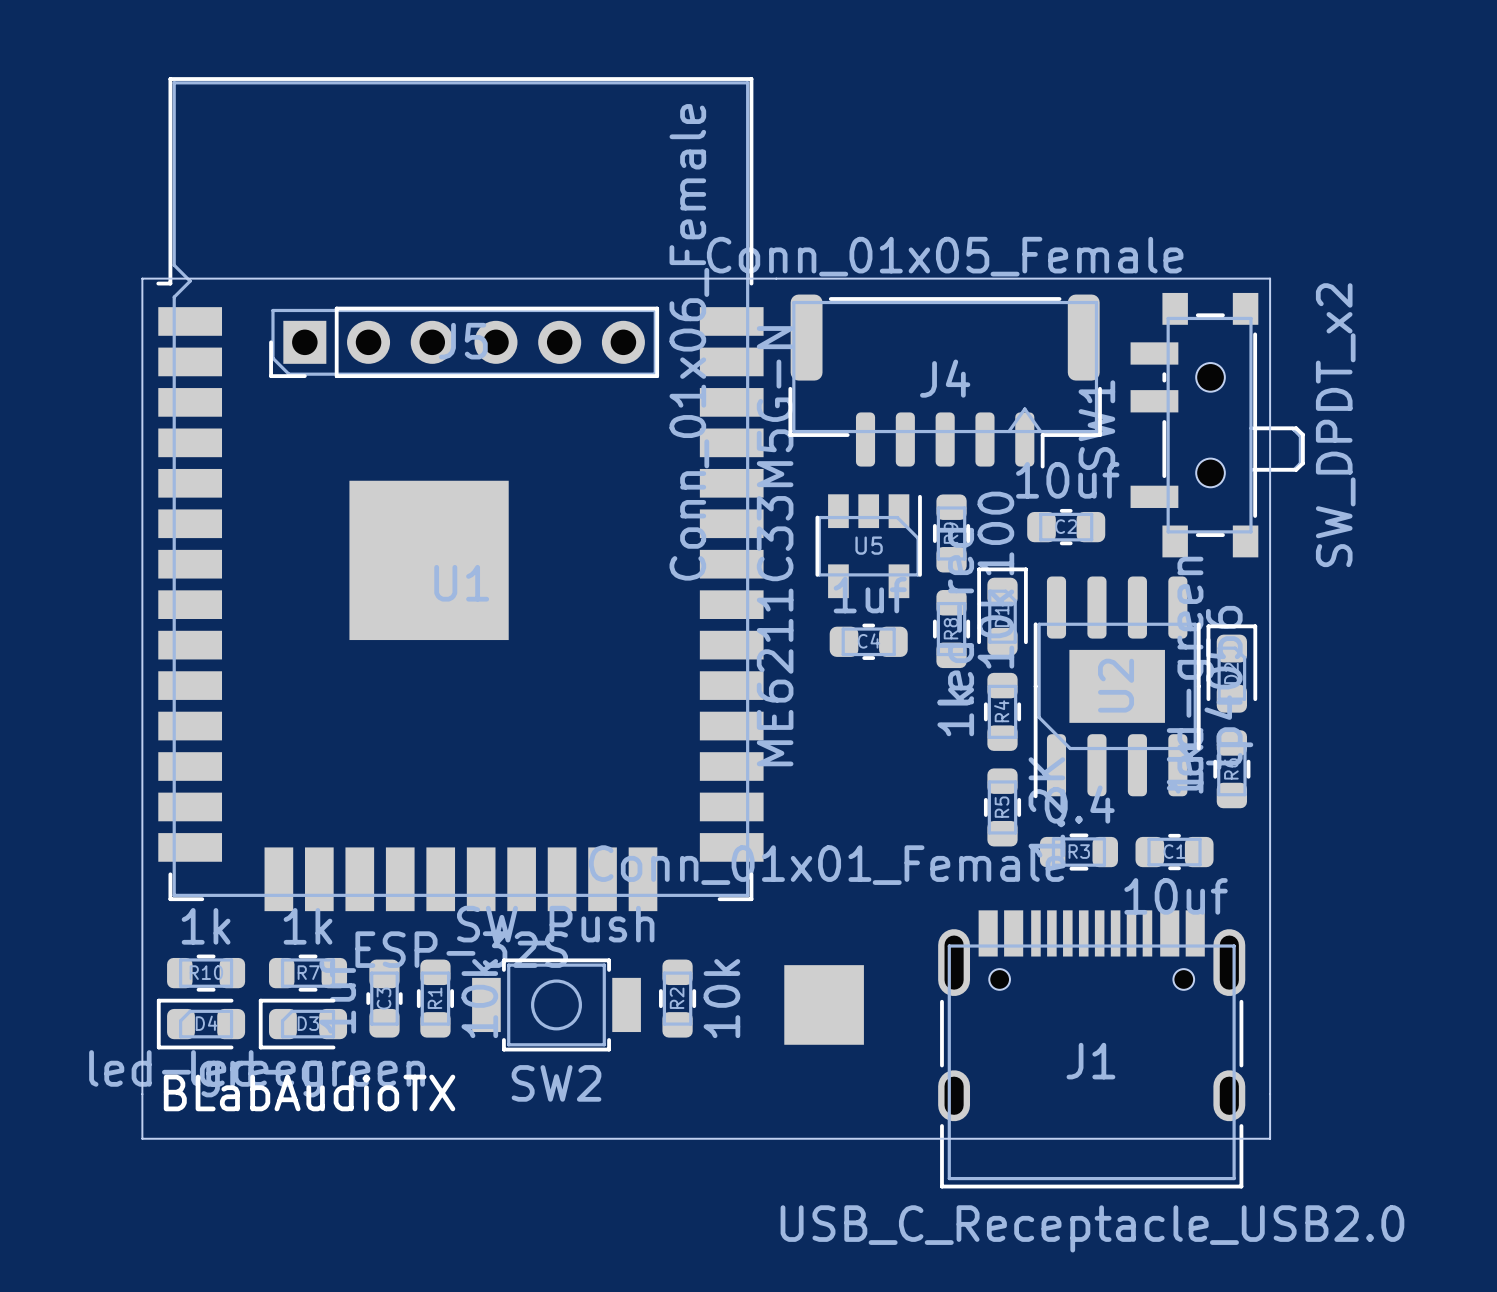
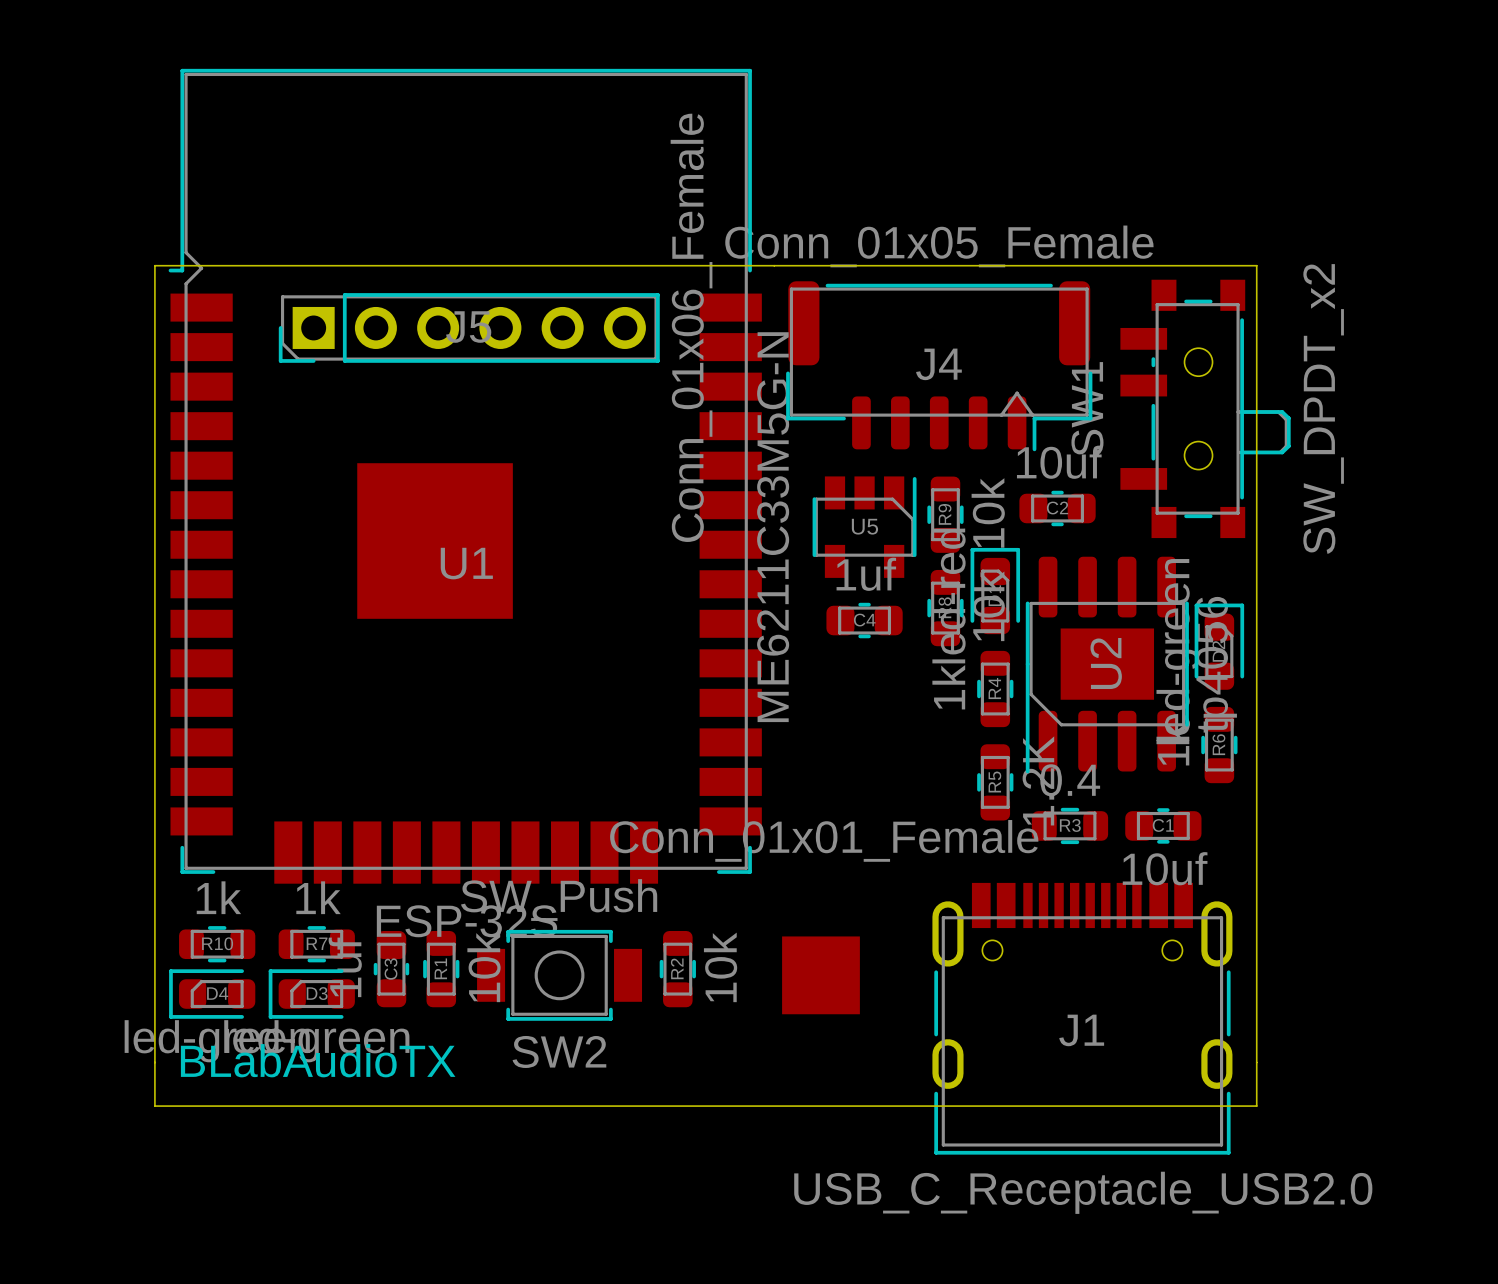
R9 value: 100 (995, 533) -> 10k (988, 512)

